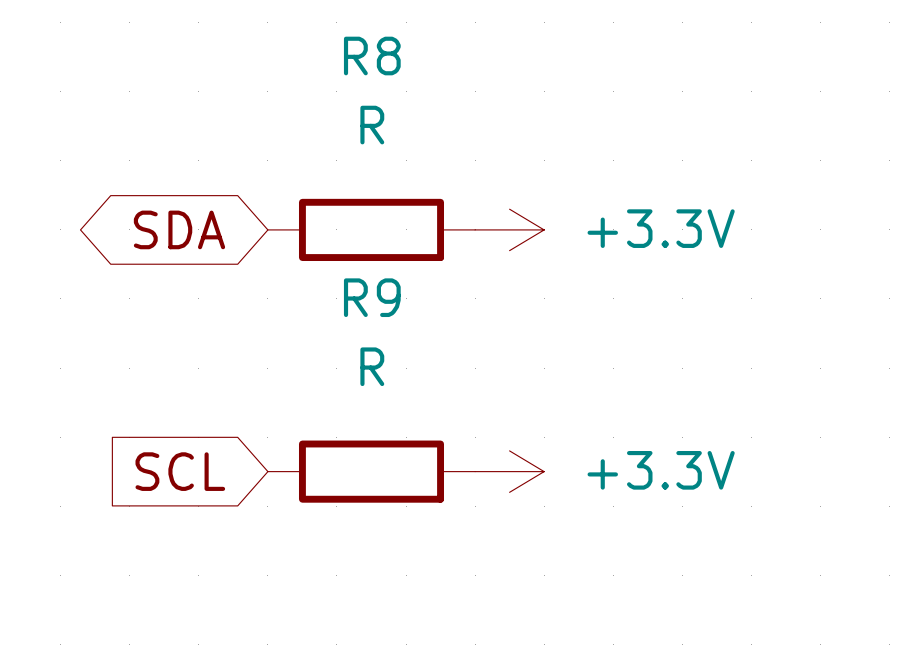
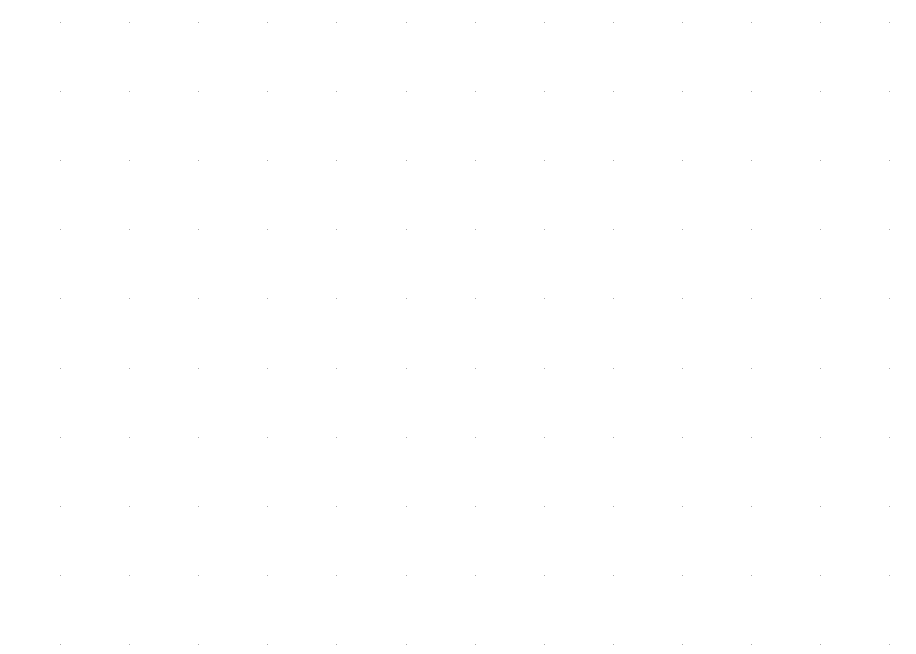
global label: SDA (179, 229) -> none
R8: R (371, 229) -> none
power symbol: +3.3V (509, 229) -> none
global label: SCL (180, 471) -> none
R9: R (371, 471) -> none
power symbol: +3.3V (509, 471) -> none

